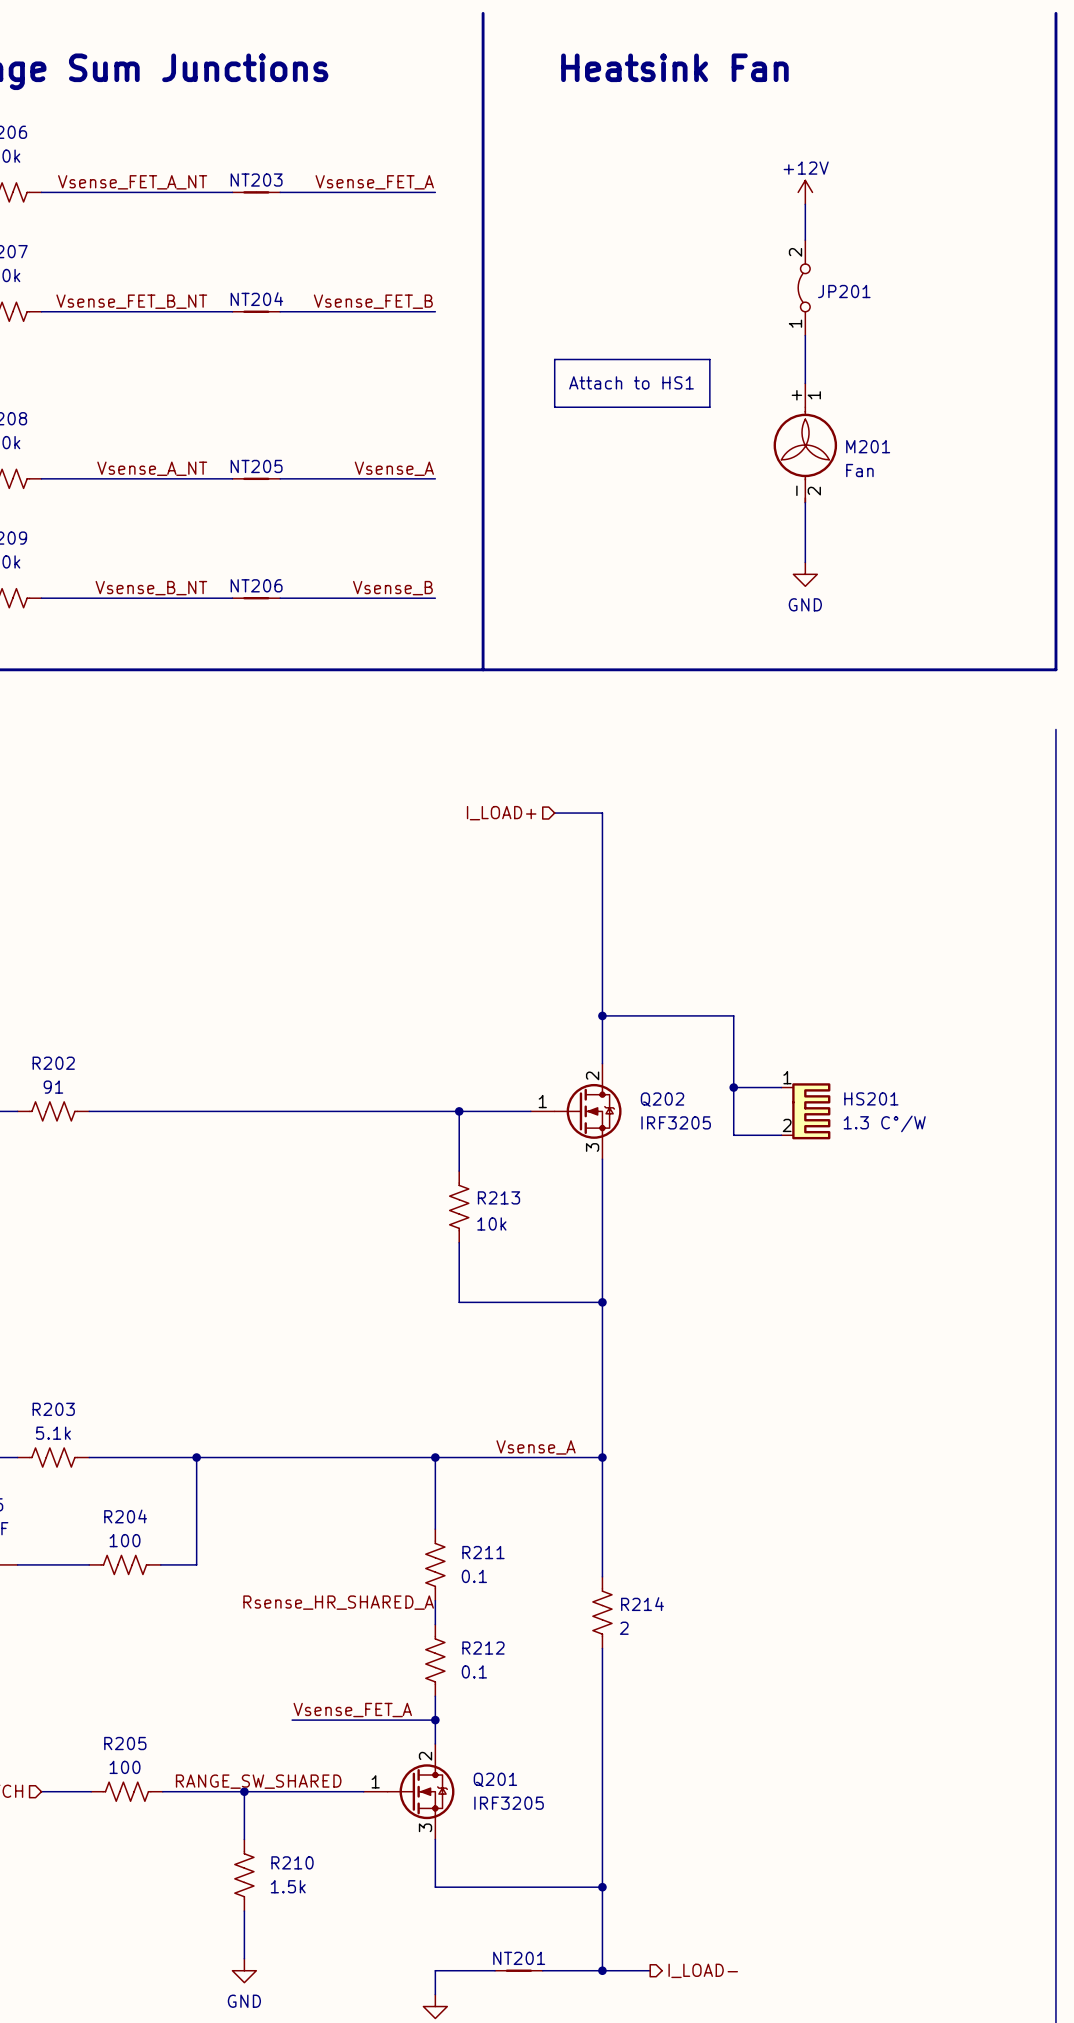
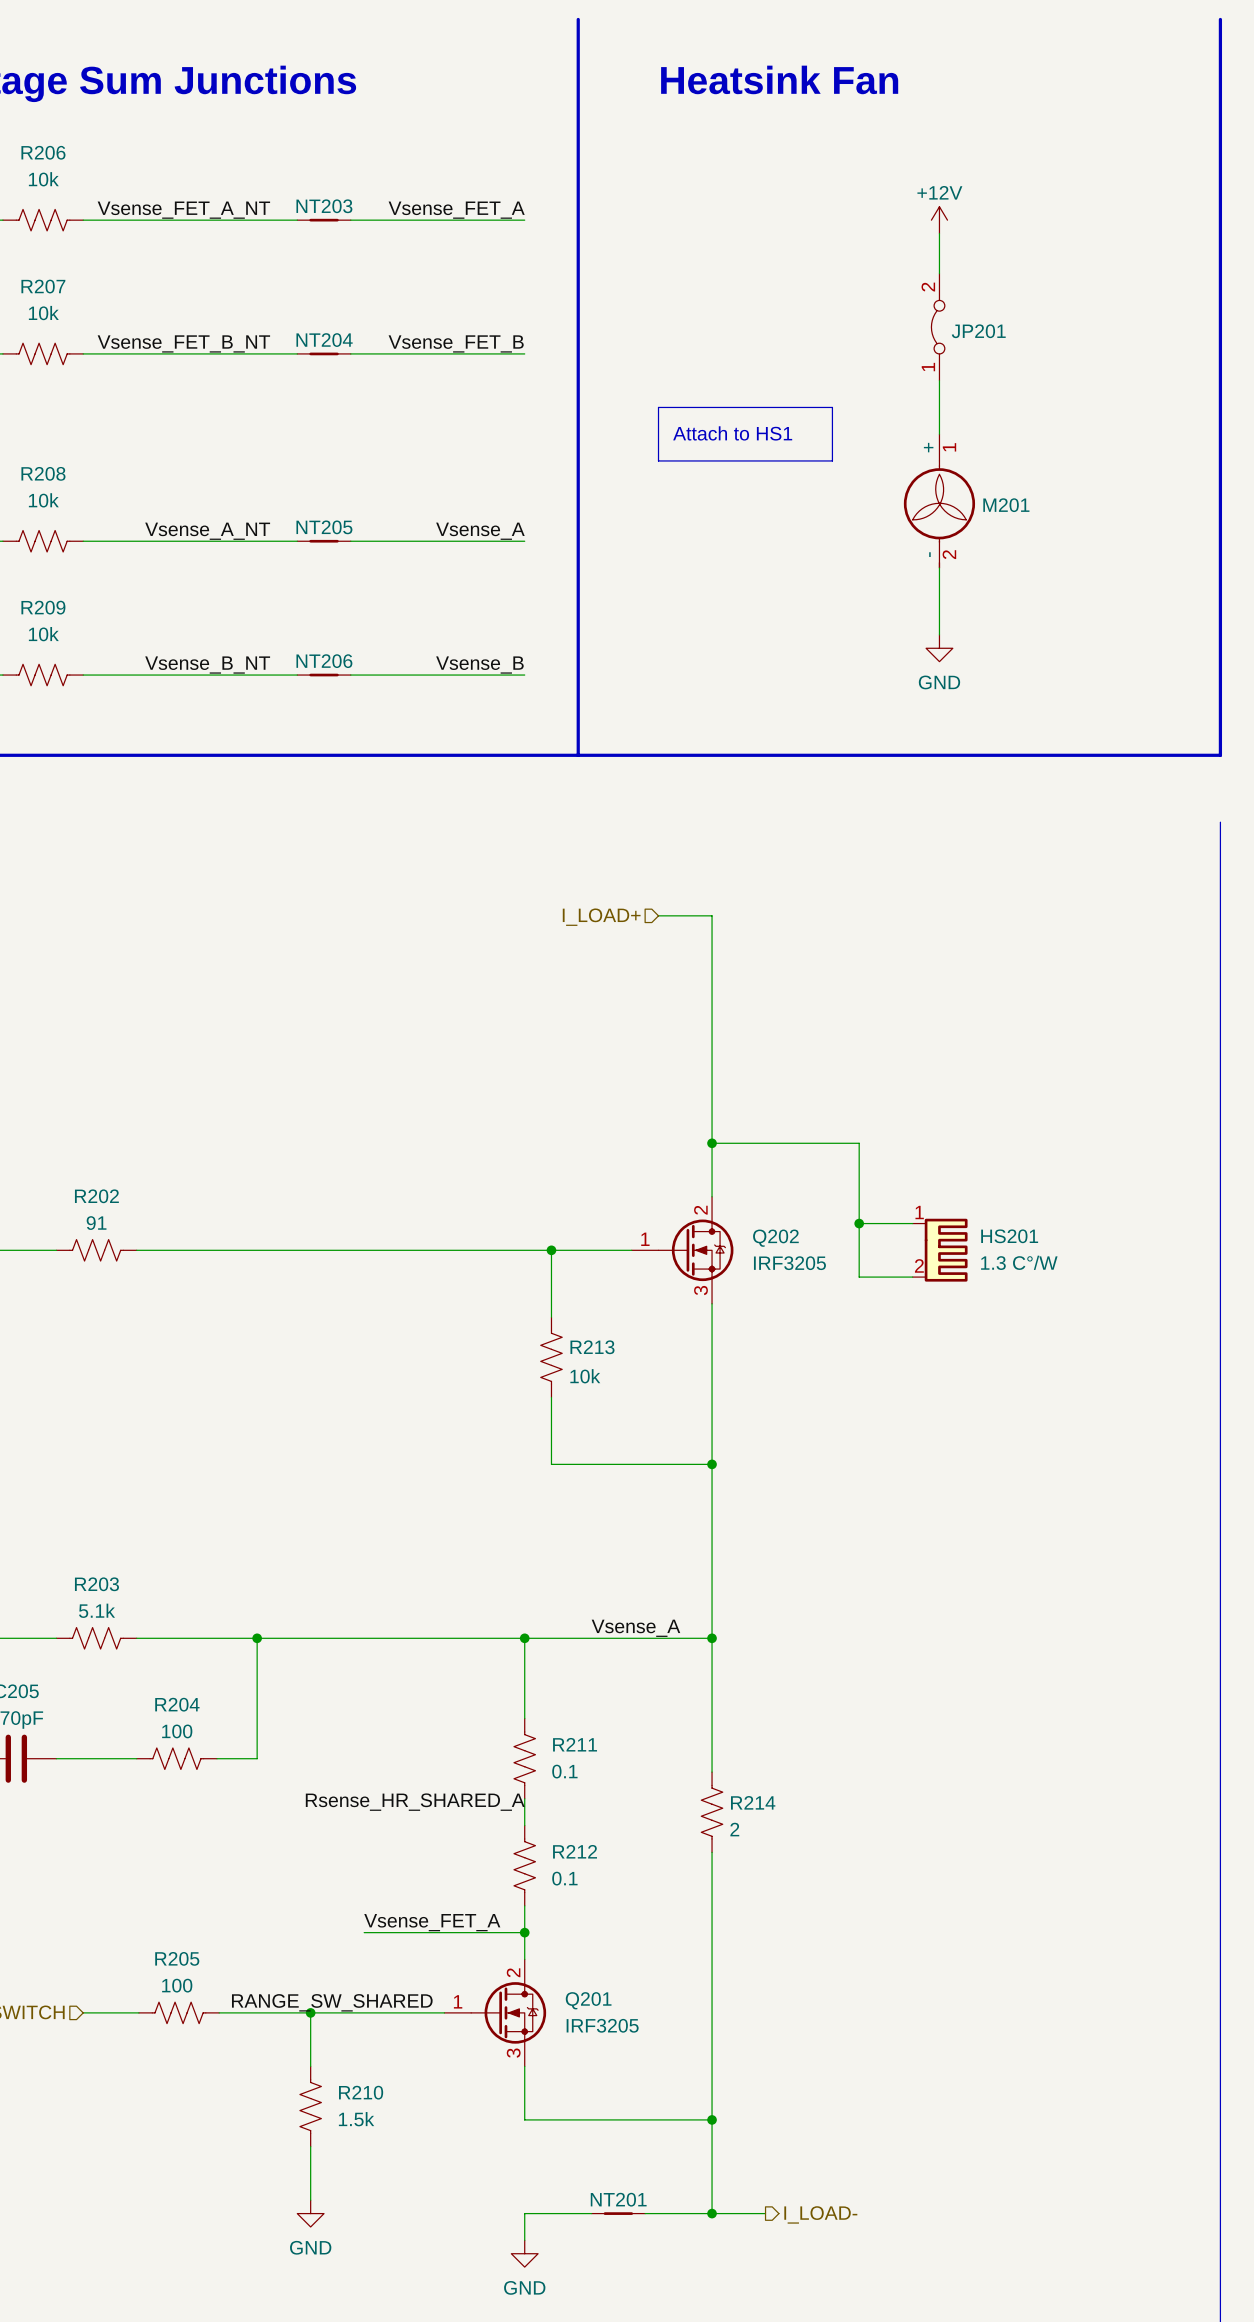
M201 value: Fan (859, 470) -> none

